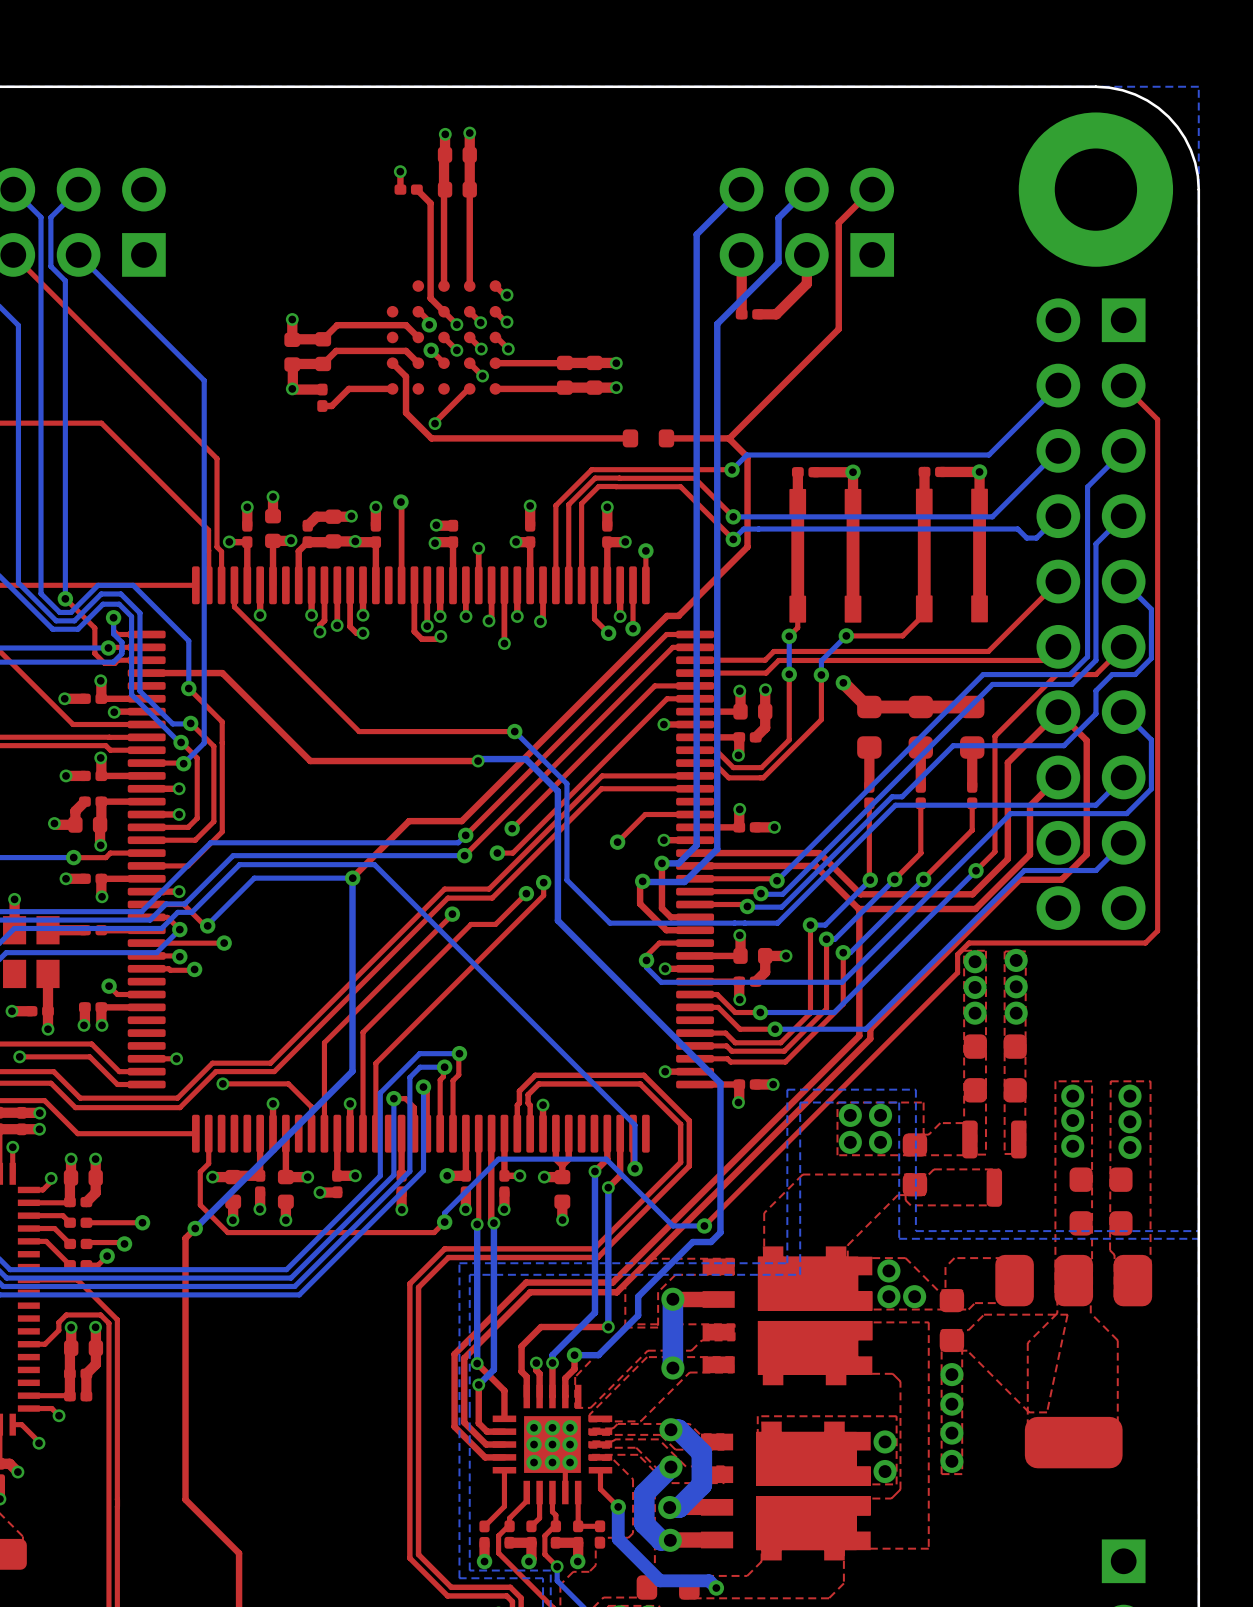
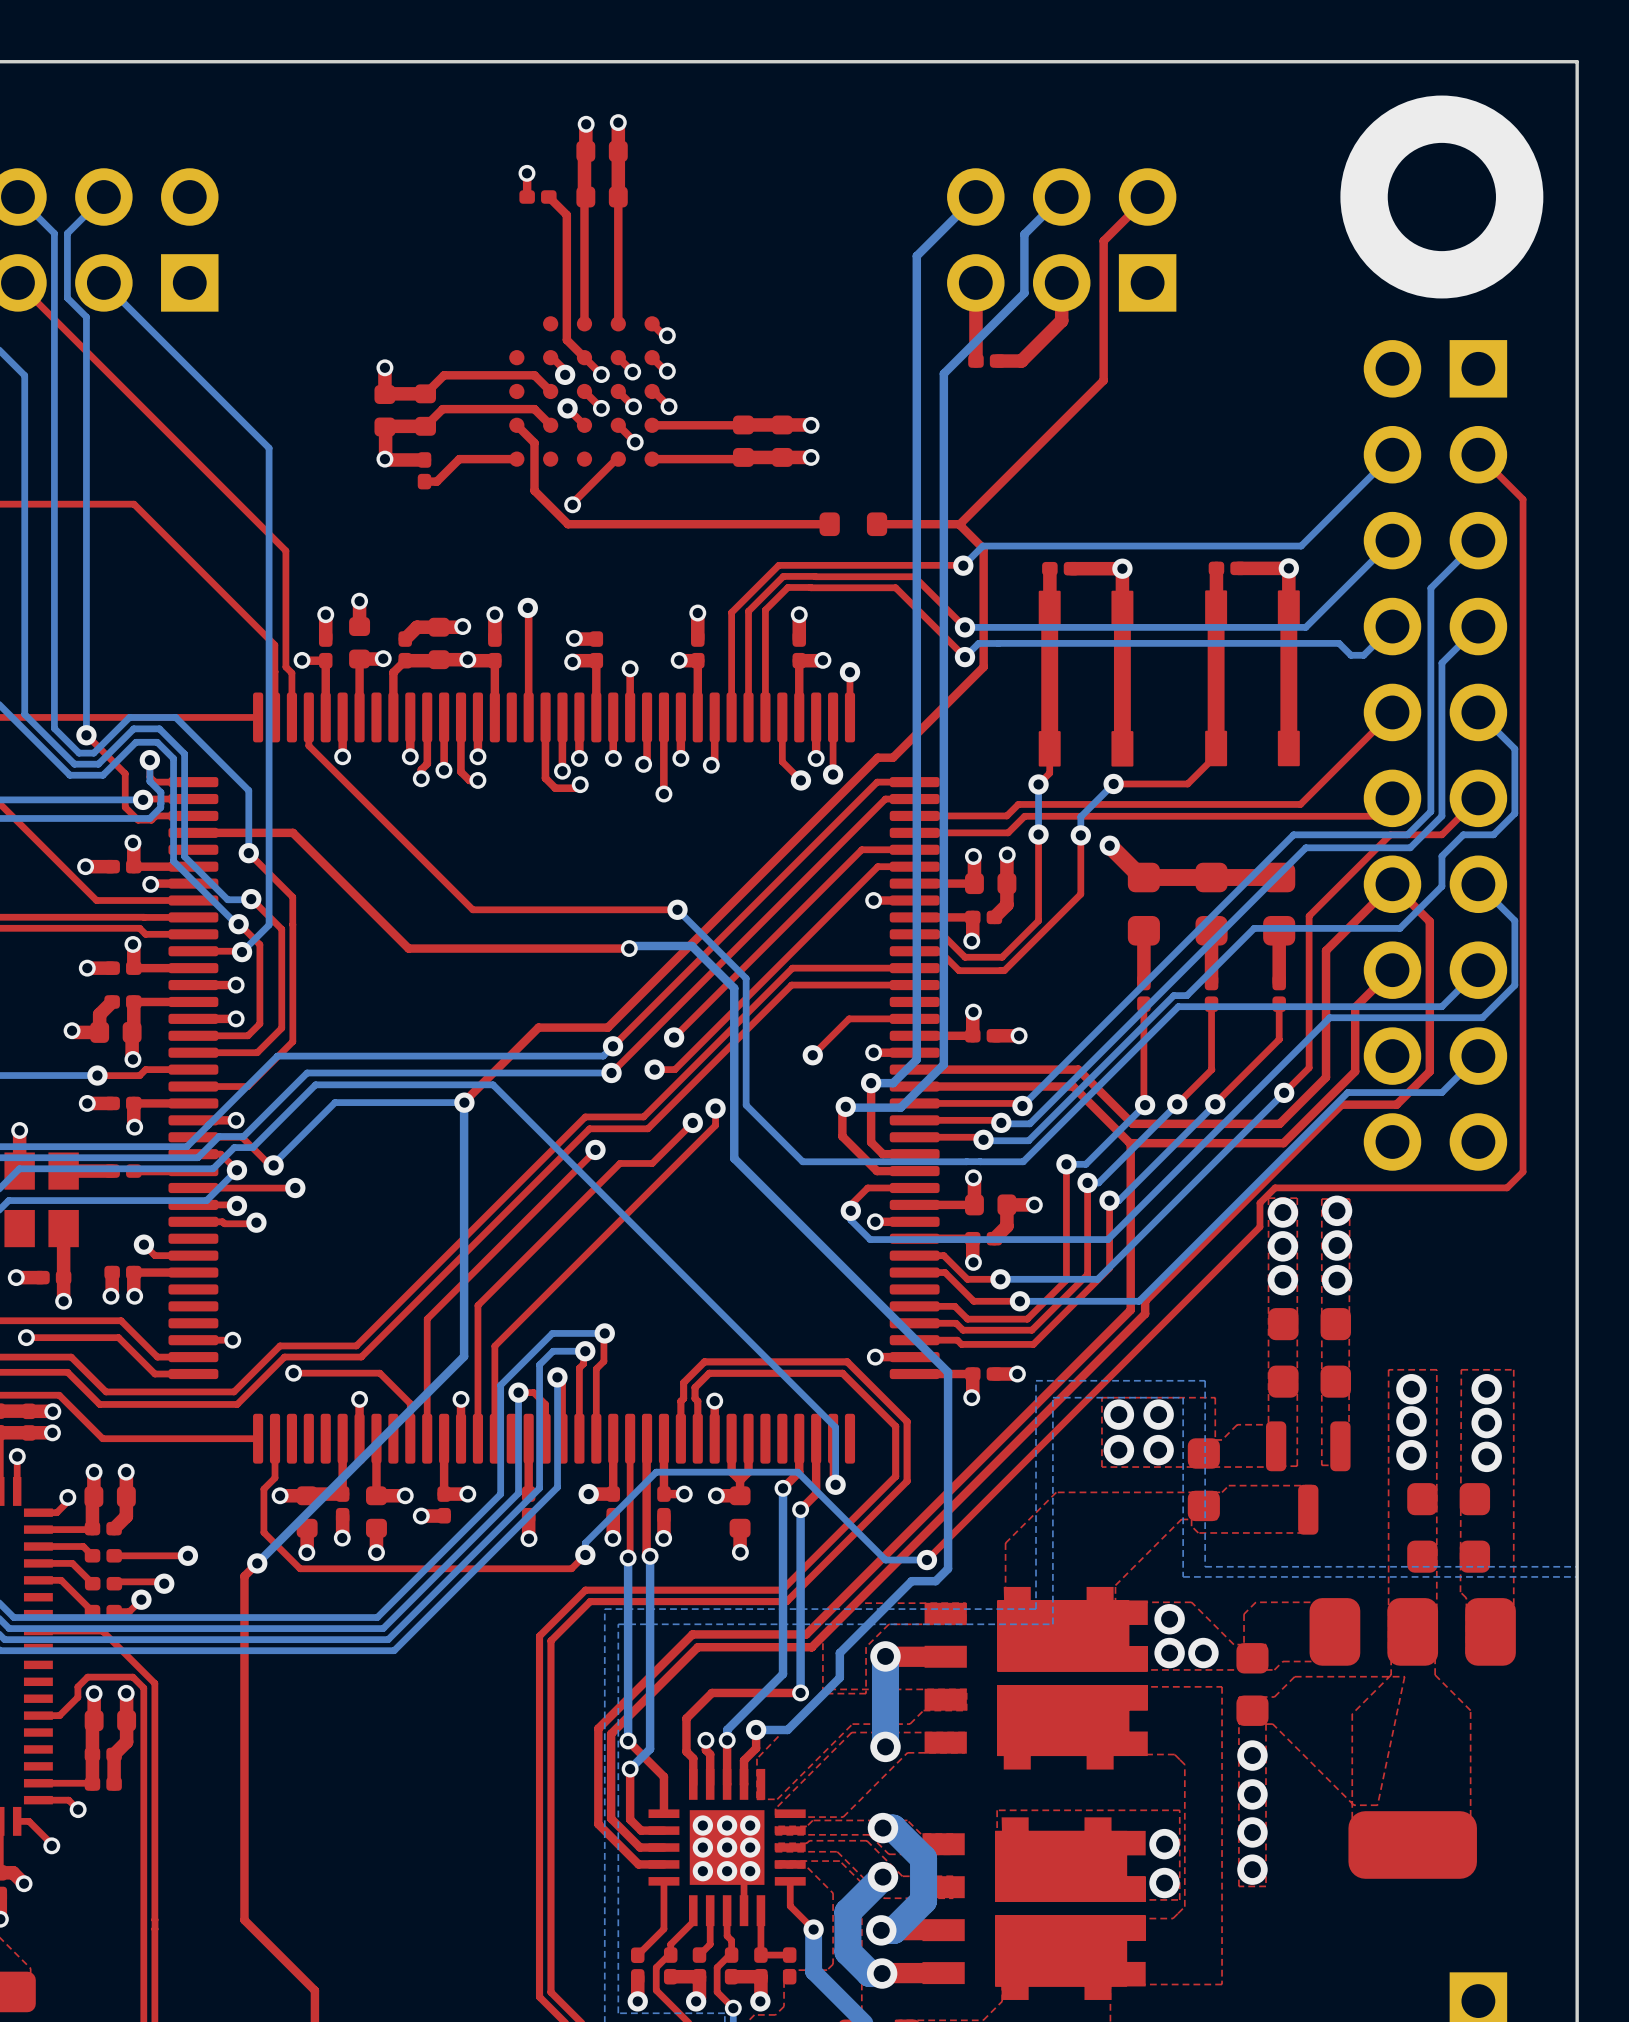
board edge: (1095, 86) (1122, 90) (1135, 94) (1147, 100) (1168, 116) (1177, 126) (1190, 150) (1197, 176) (1198, 189) -> (1441, 61) (1577, 61) (1577, 197)

